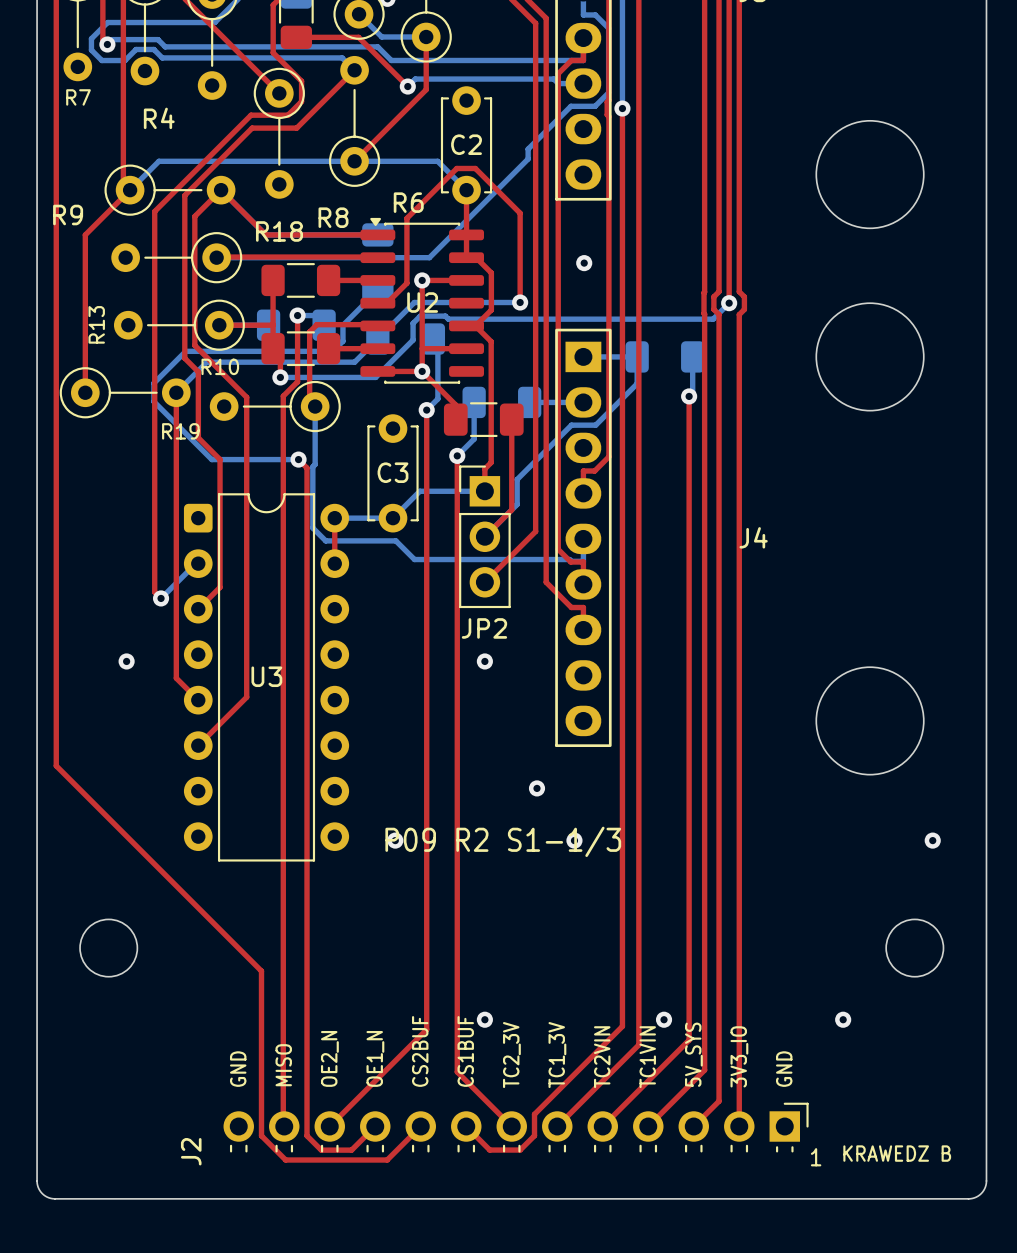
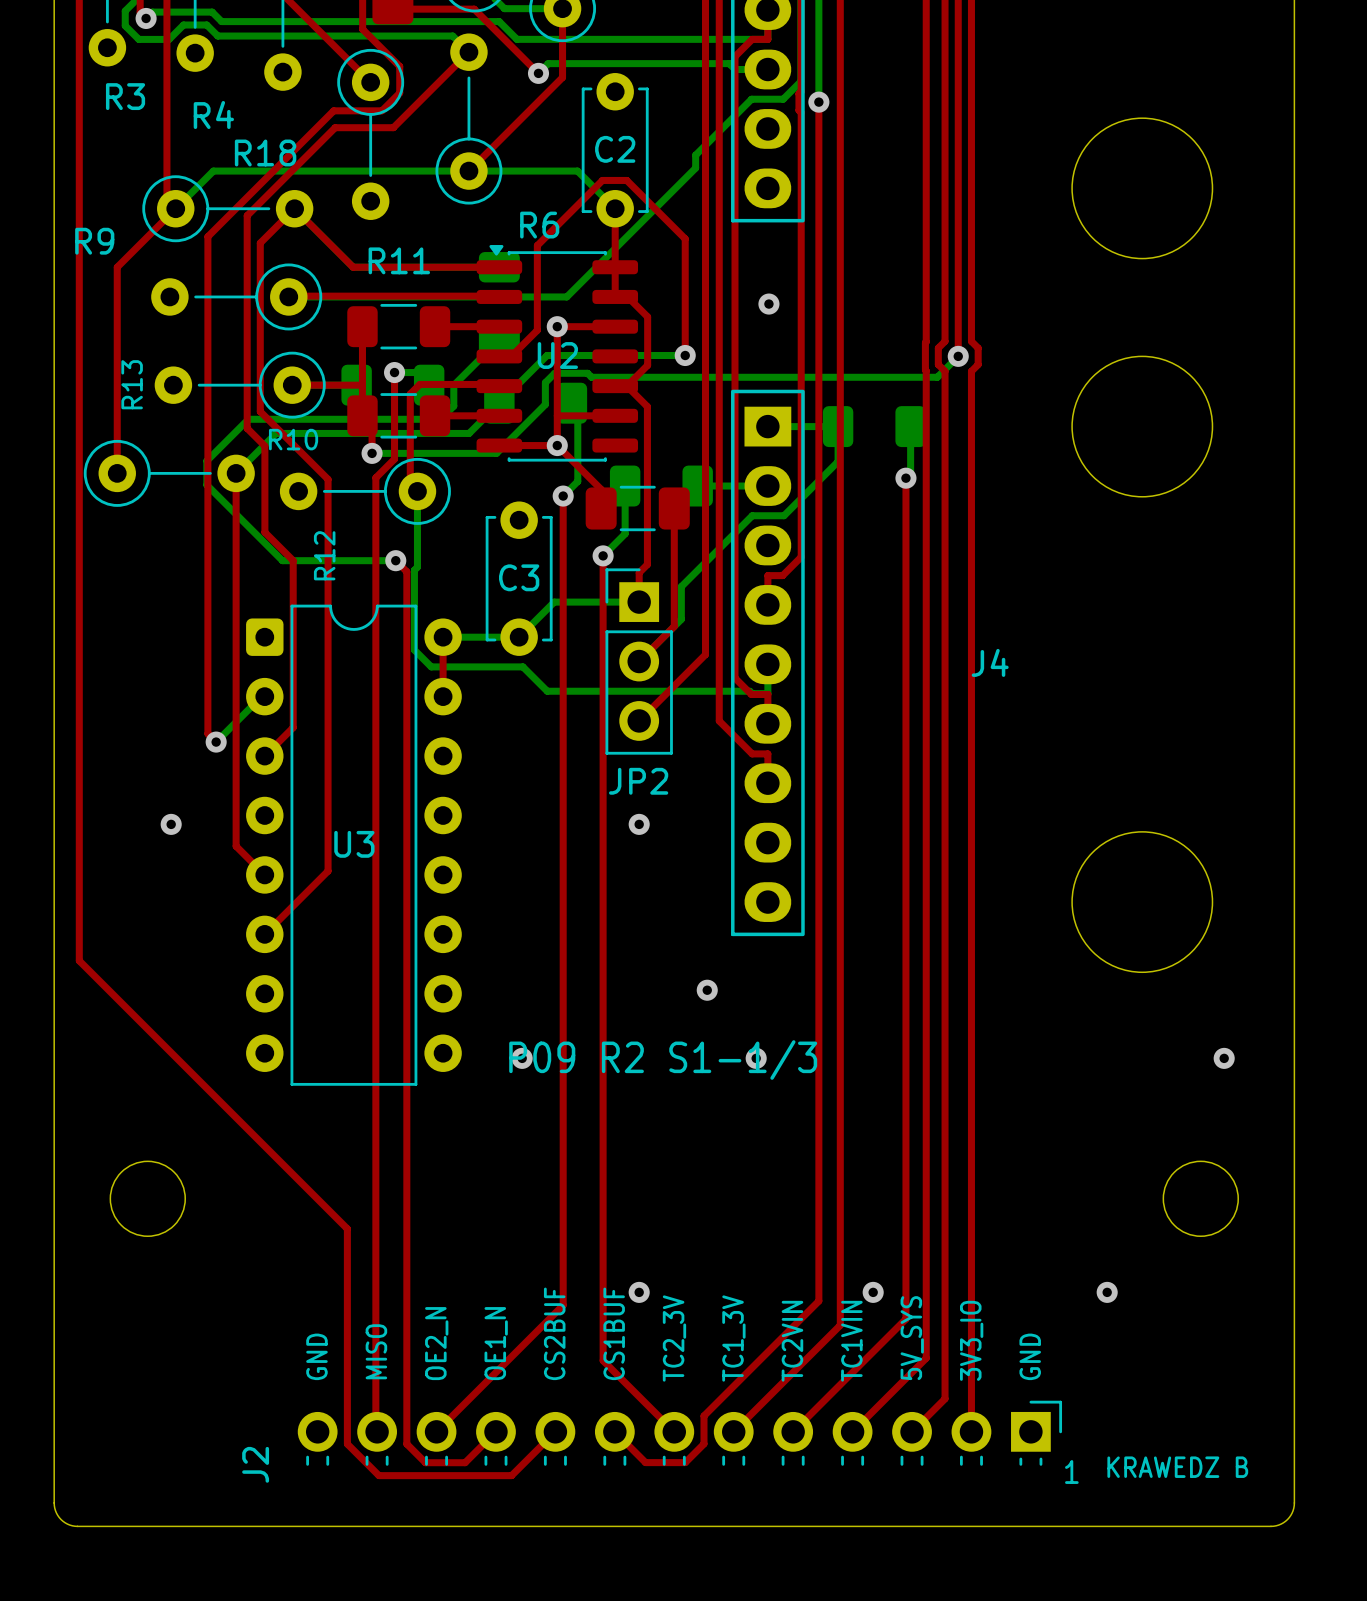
R7 name: R7 (78, 97) -> none
R3 name: none -> R3 (125, 96)
R8 name: R8 (333, 217) -> none
R11 name: none -> R11 (399, 260)
R18 name position: R18 (279, 231) -> R18 (265, 152)
R19 name: R19 (180, 431) -> none
R12 name: none -> R12 (324, 555)

